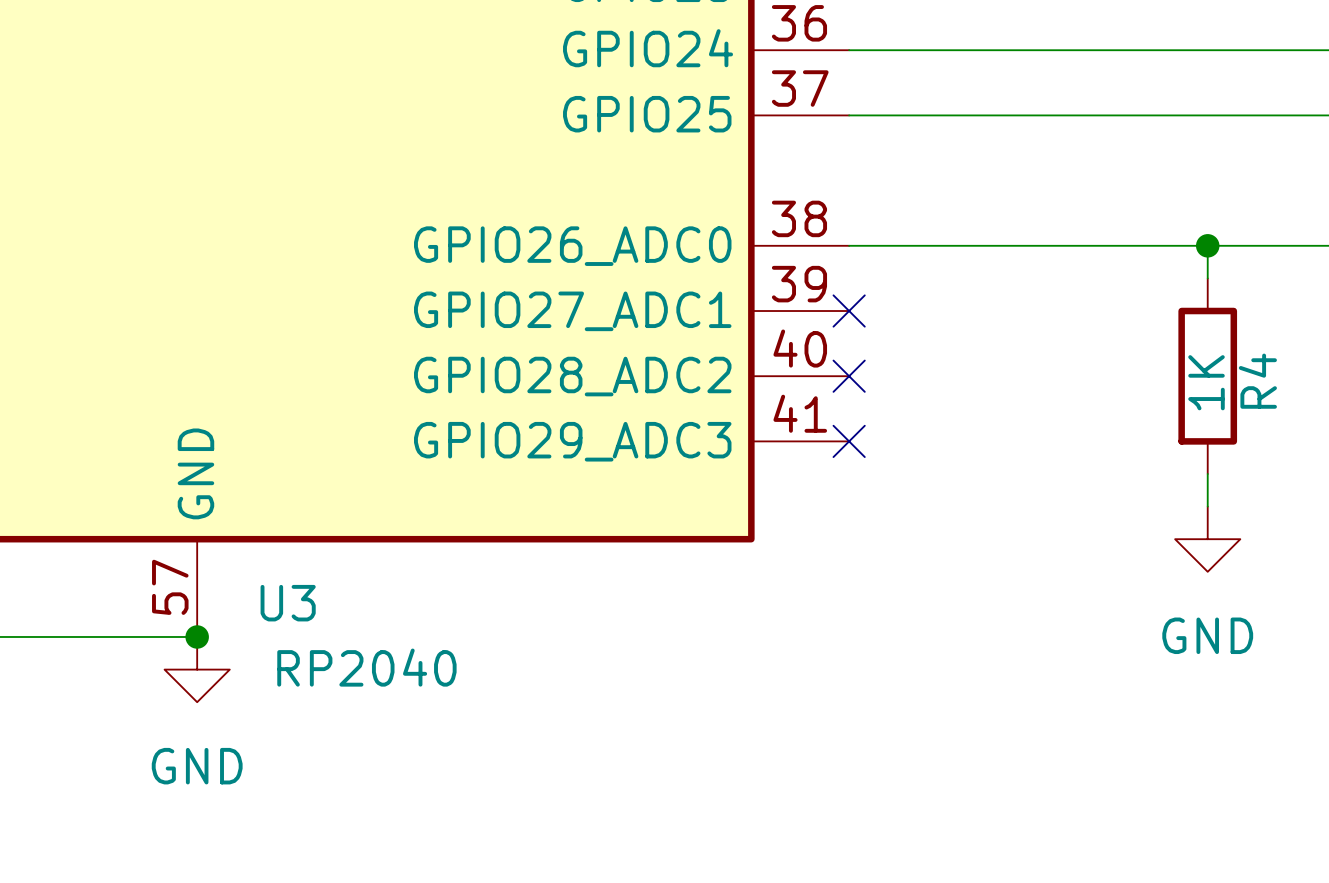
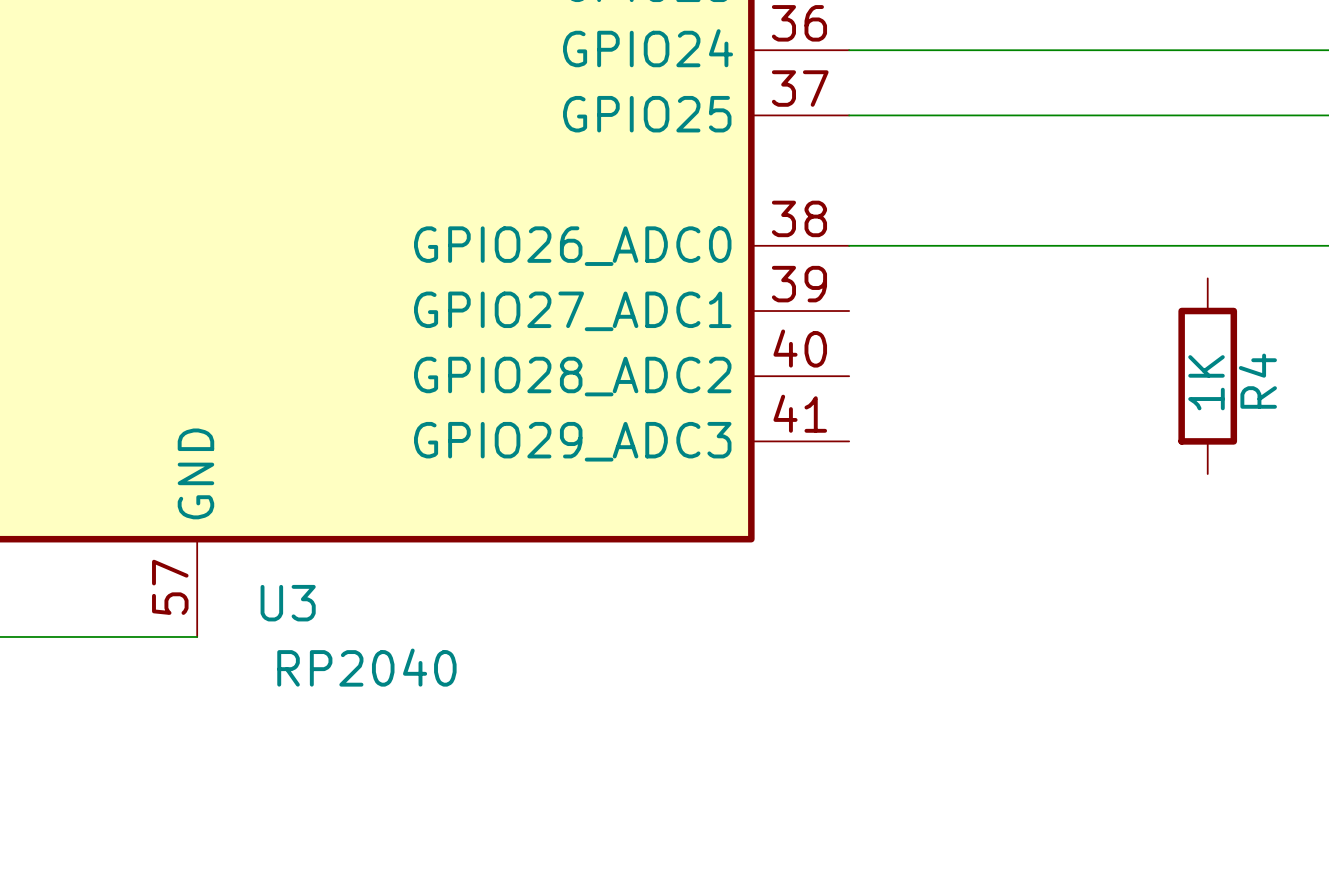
wire: (1207, 245) (1207, 278) -> none
junction: (1207, 245) -> none
no-connect mark: (849, 311) -> none
no-connect mark: (849, 376) -> none
no-connect mark: (849, 441) -> none
wire: (1207, 474) (1207, 506) -> none
power symbol: GND (1207, 539) -> none
junction: (197, 636) -> none
power symbol: GND (197, 669) -> none

